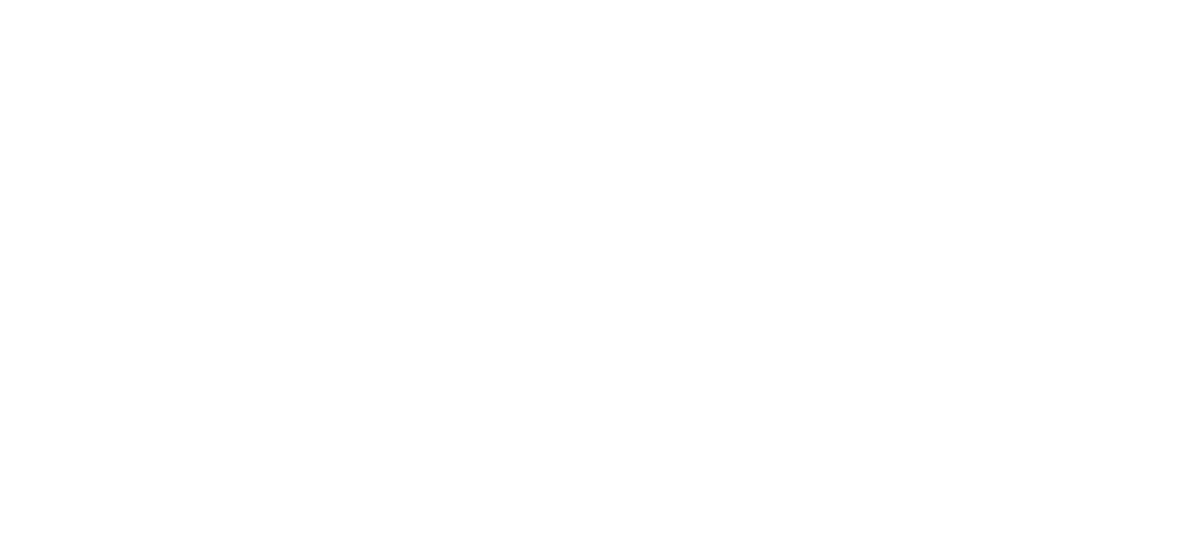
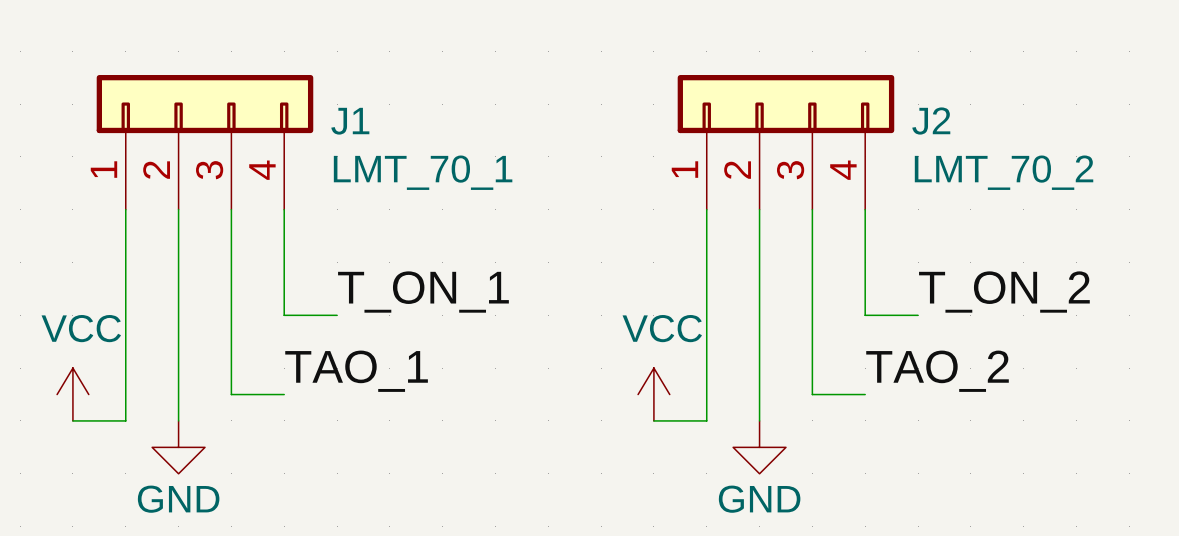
J1: none -> LMT_70_1 (204, 142)
J2: none -> LMT_70_2 (785, 142)
wire: none -> (125, 209) (125, 420) (72, 420)
wire: none -> (178, 209) (178, 420)
wire: none -> (231, 209) (231, 394) (284, 394)
wire: none -> (284, 209) (284, 315) (337, 315)
wire: none -> (706, 209) (706, 420) (653, 420)
wire: none -> (759, 209) (759, 420)
wire: none -> (812, 209) (812, 394) (865, 394)
wire: none -> (865, 209) (865, 315) (918, 315)
label: none -> T_ON_1 (423, 292)
label: none -> T_ON_2 (1004, 292)
label: none -> TAO_1 (356, 371)
label: none -> TAO_2 (937, 371)
power symbol: none -> VCC (72, 394)
power symbol: none -> VCC (653, 394)
power symbol: none -> GND (178, 447)
power symbol: none -> GND (759, 447)

